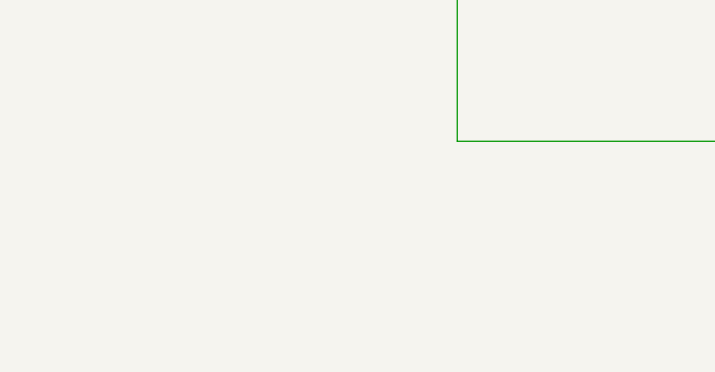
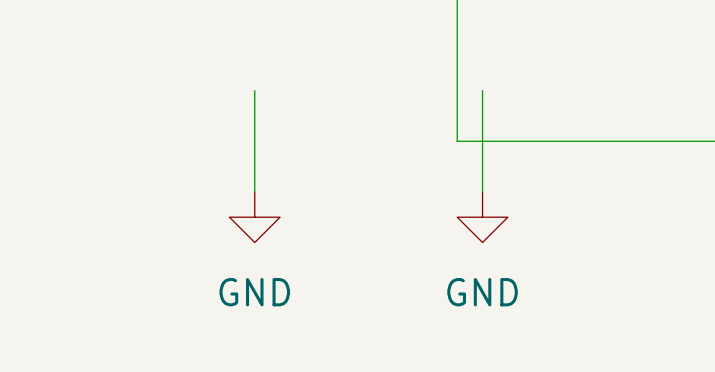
wire: none -> (254, 90) (254, 191)
wire: none -> (482, 90) (482, 191)
power symbol: none -> GND (254, 217)
power symbol: none -> GND (482, 217)

